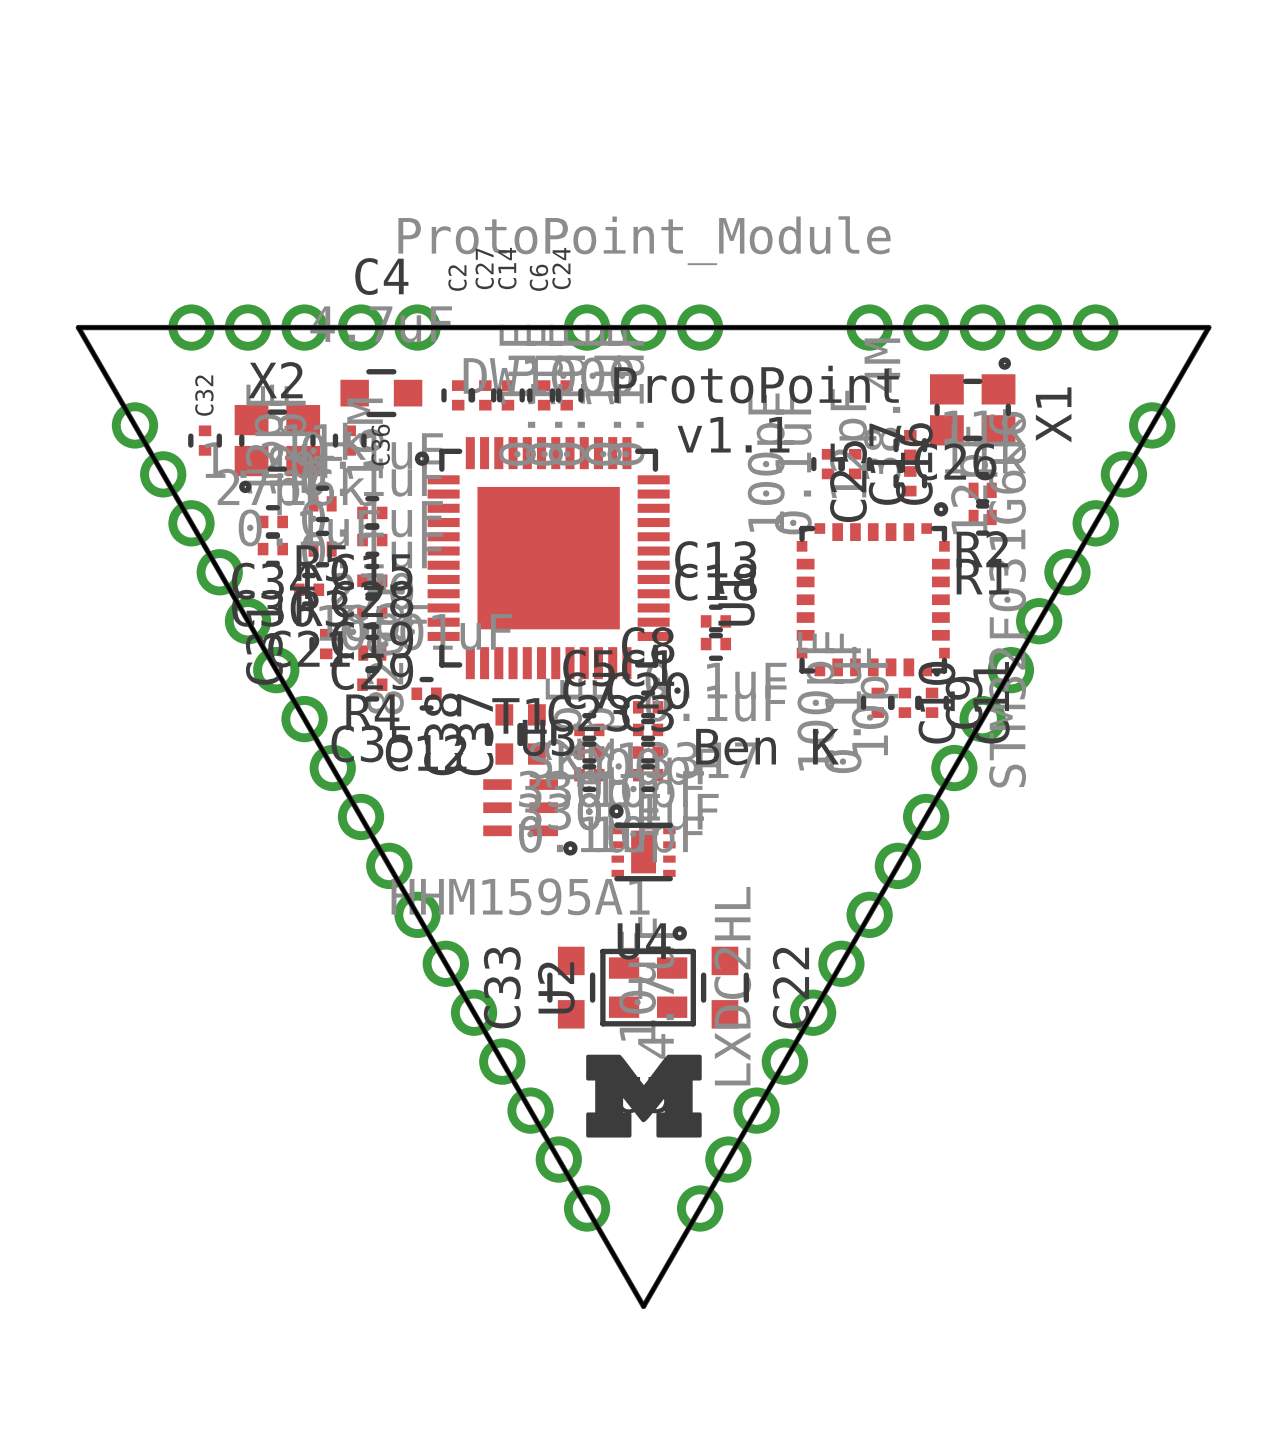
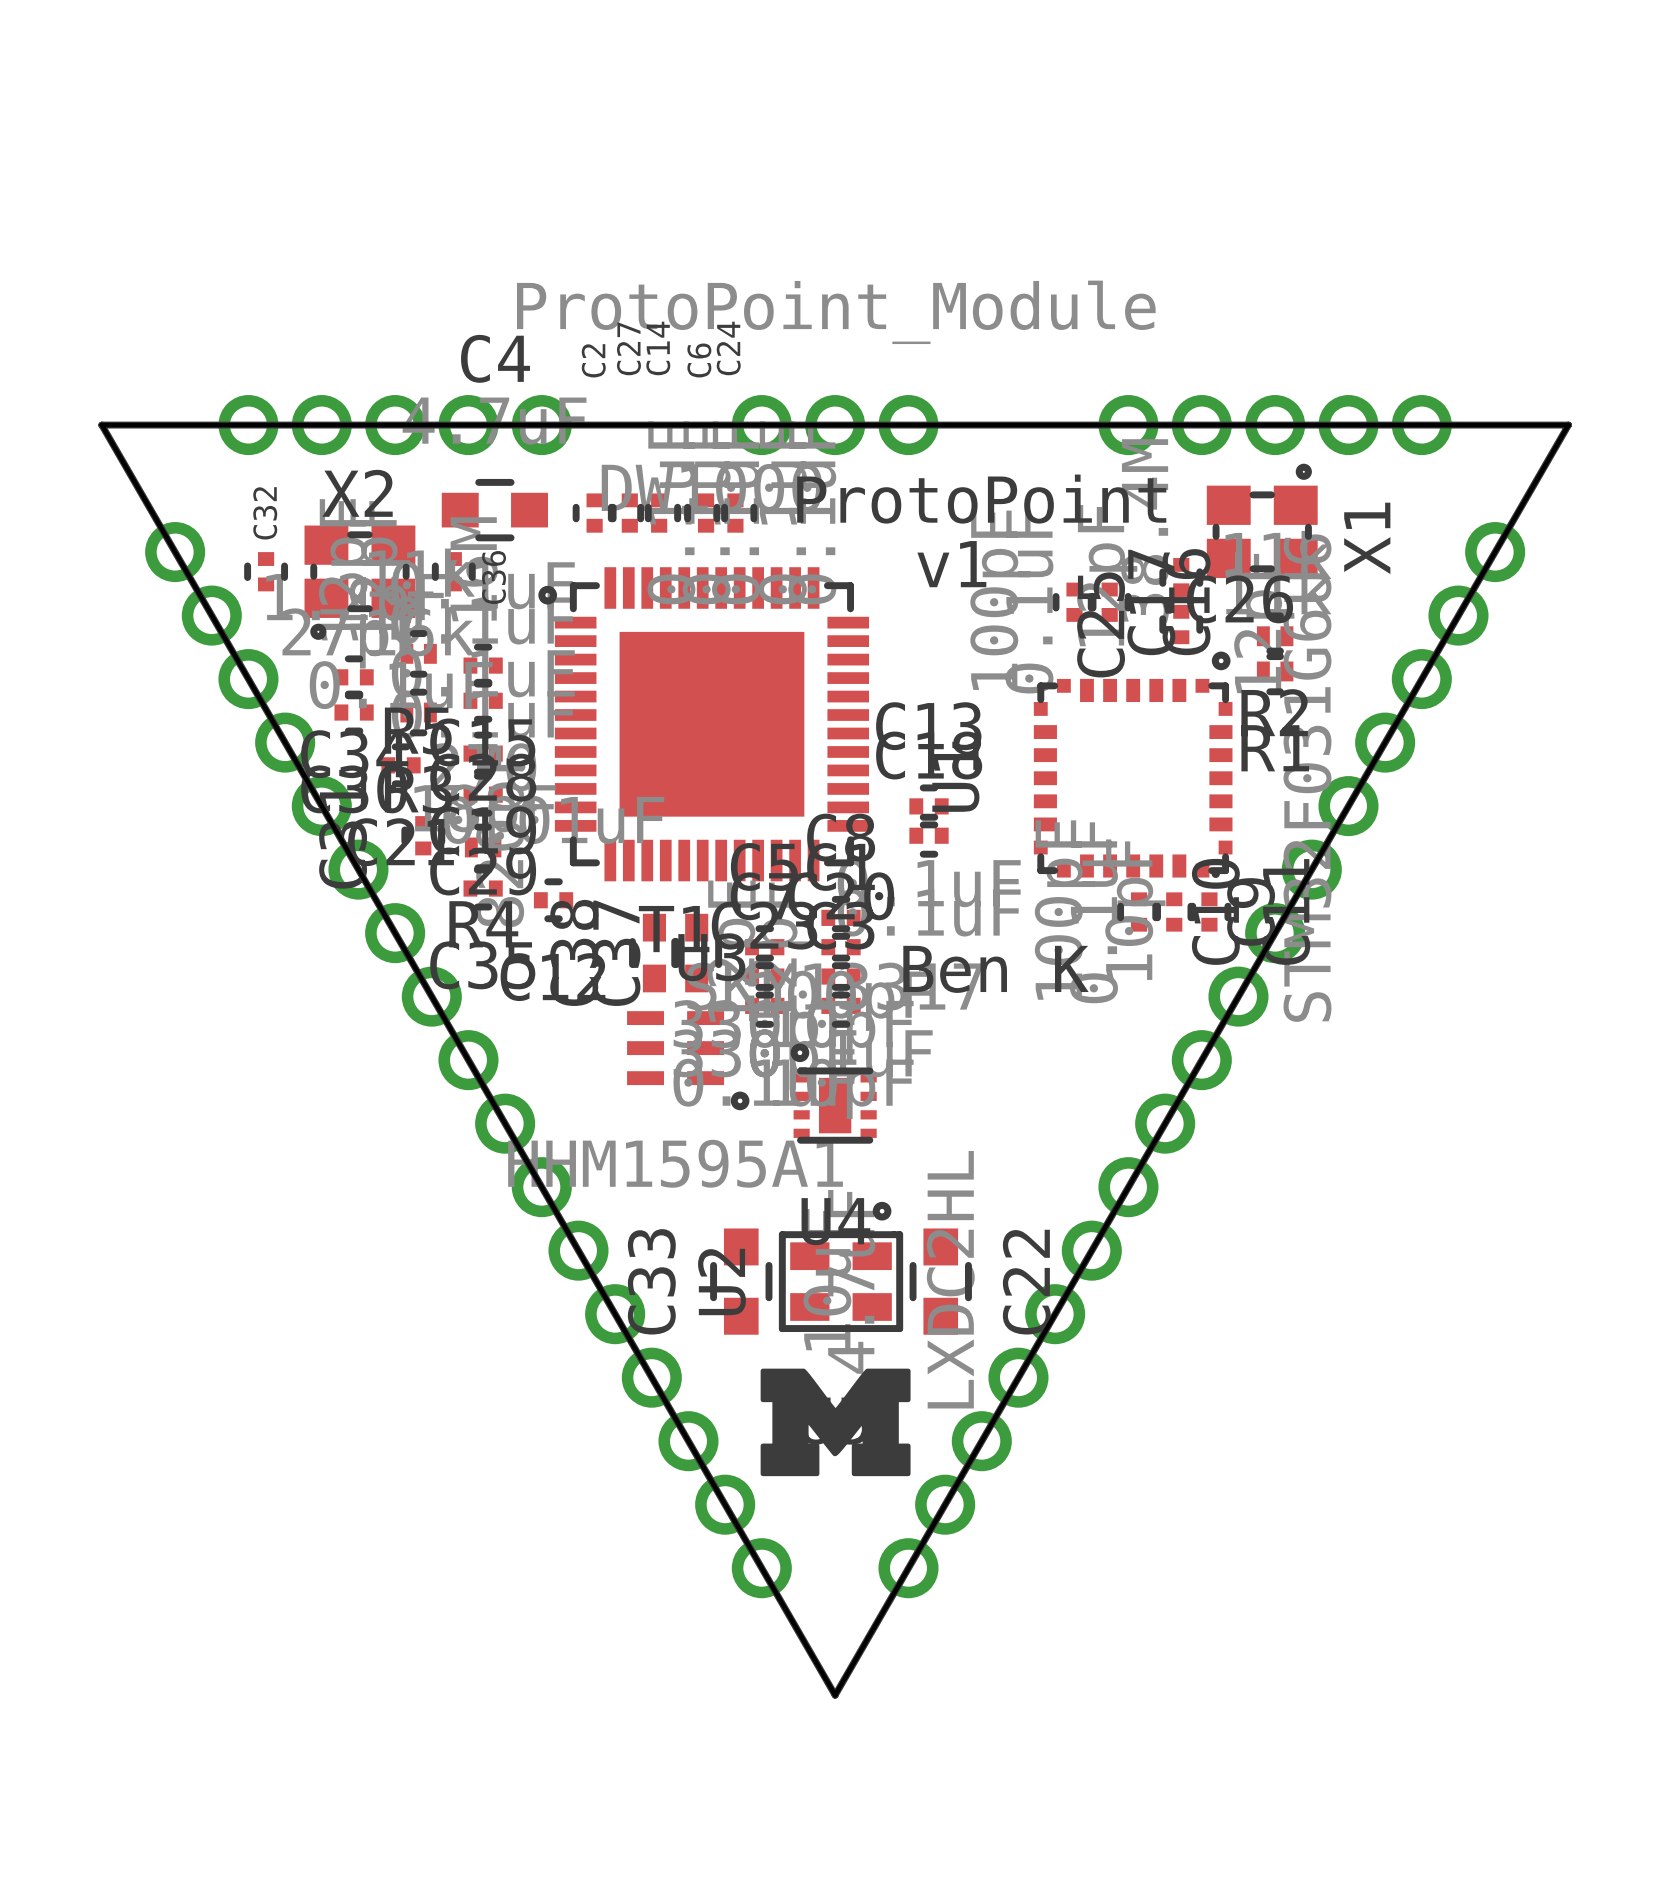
text: v1.1 (733, 434) -> v1 (951, 564)

